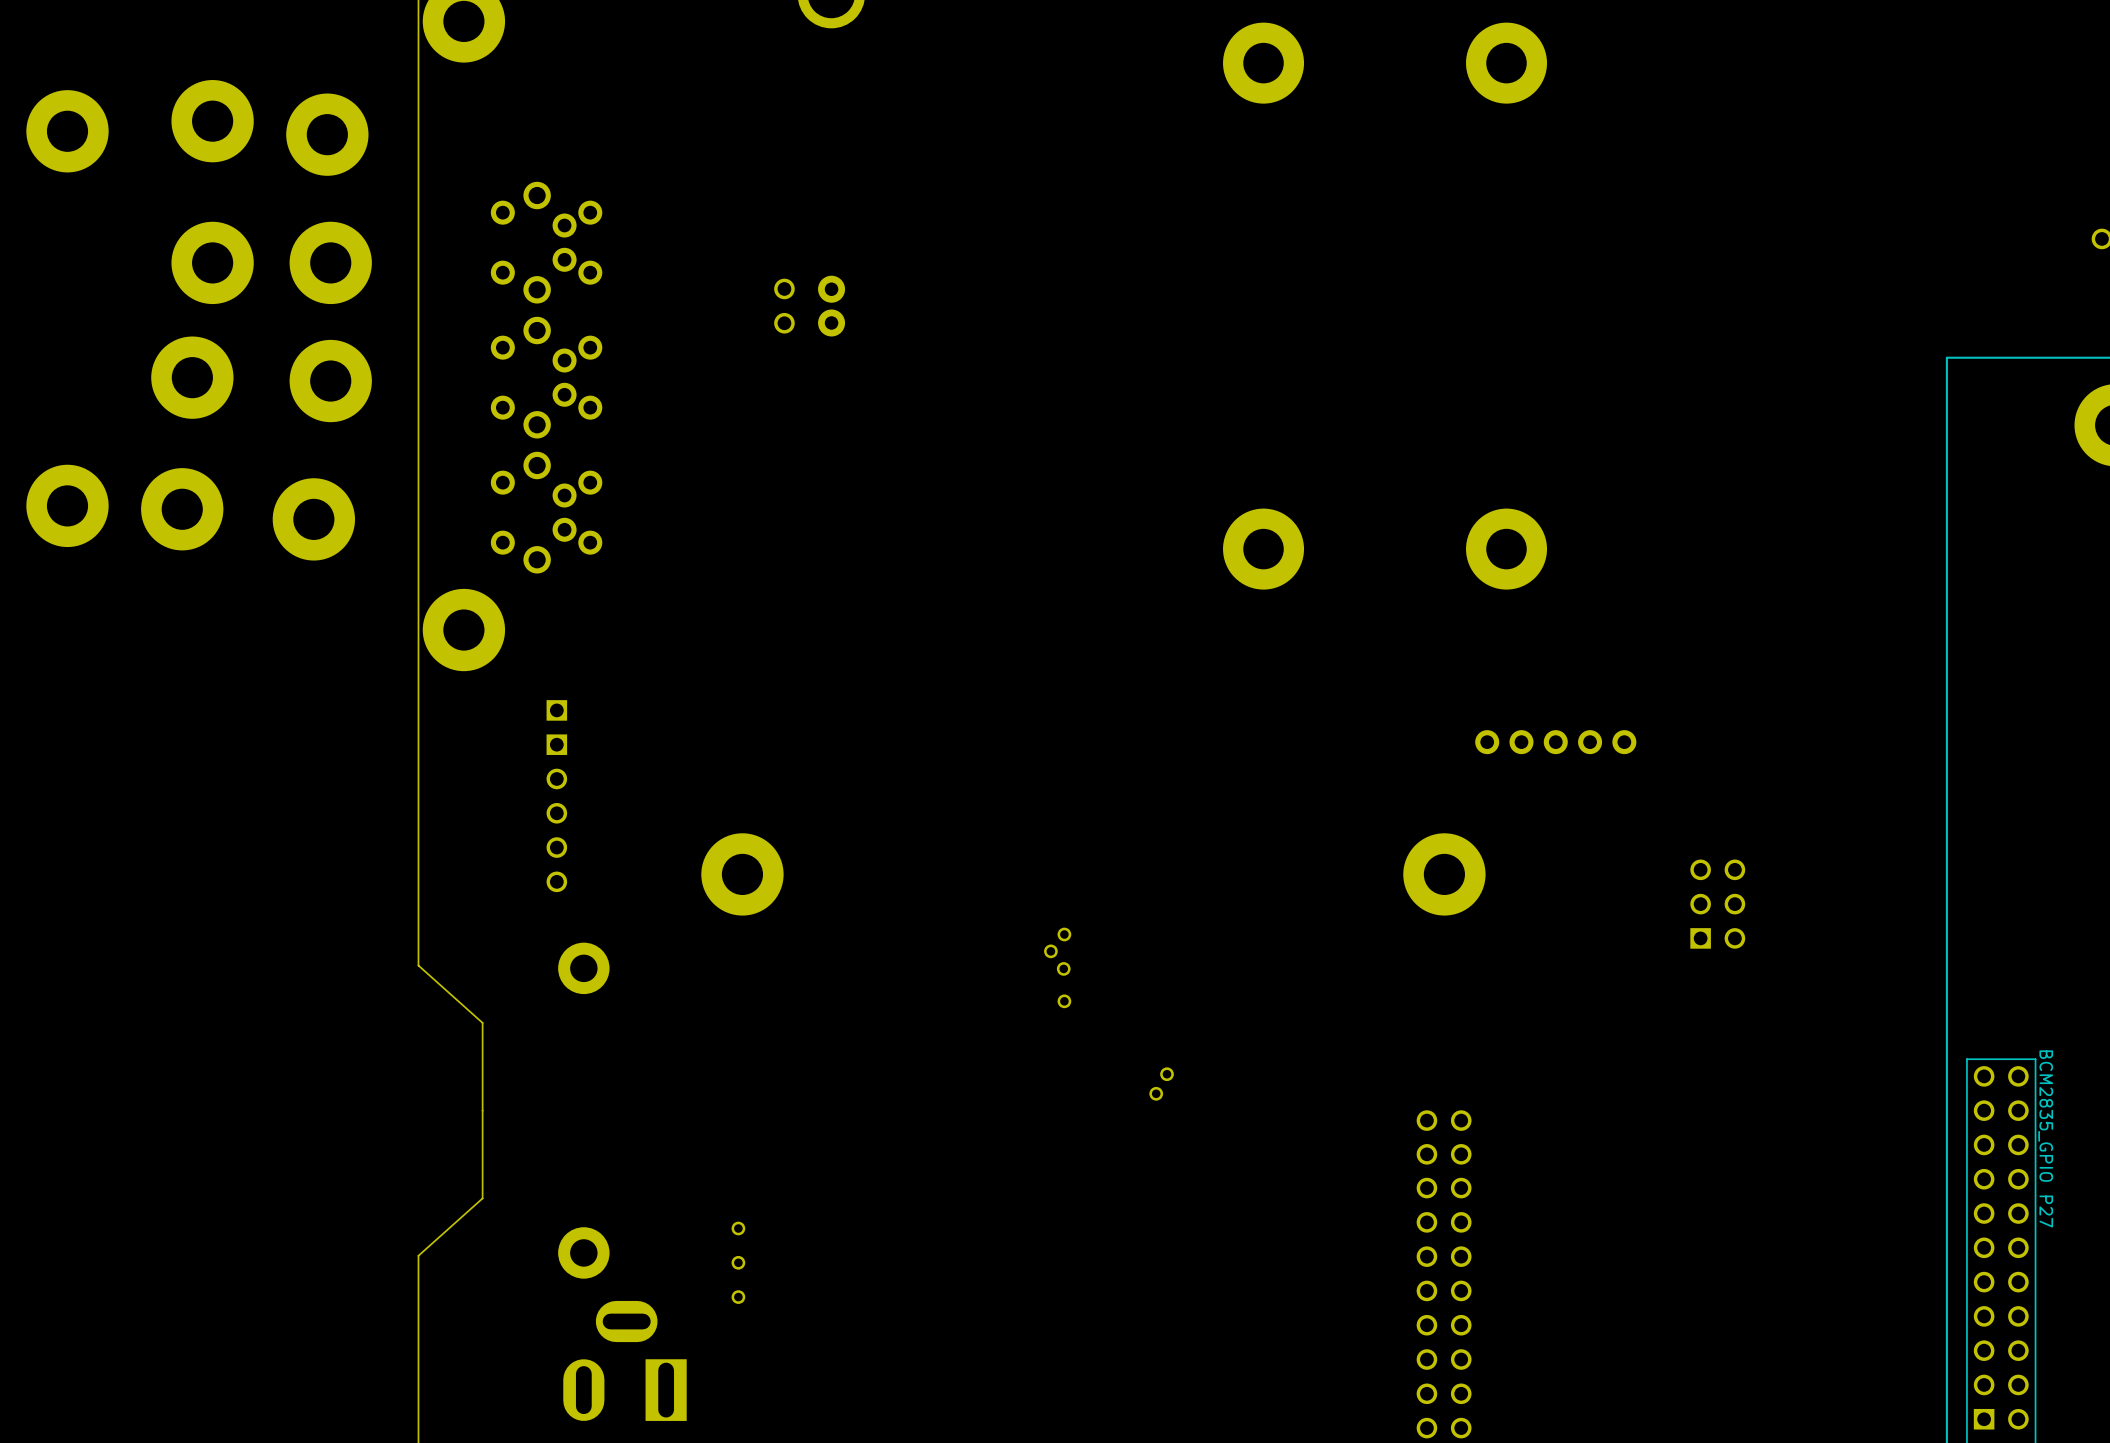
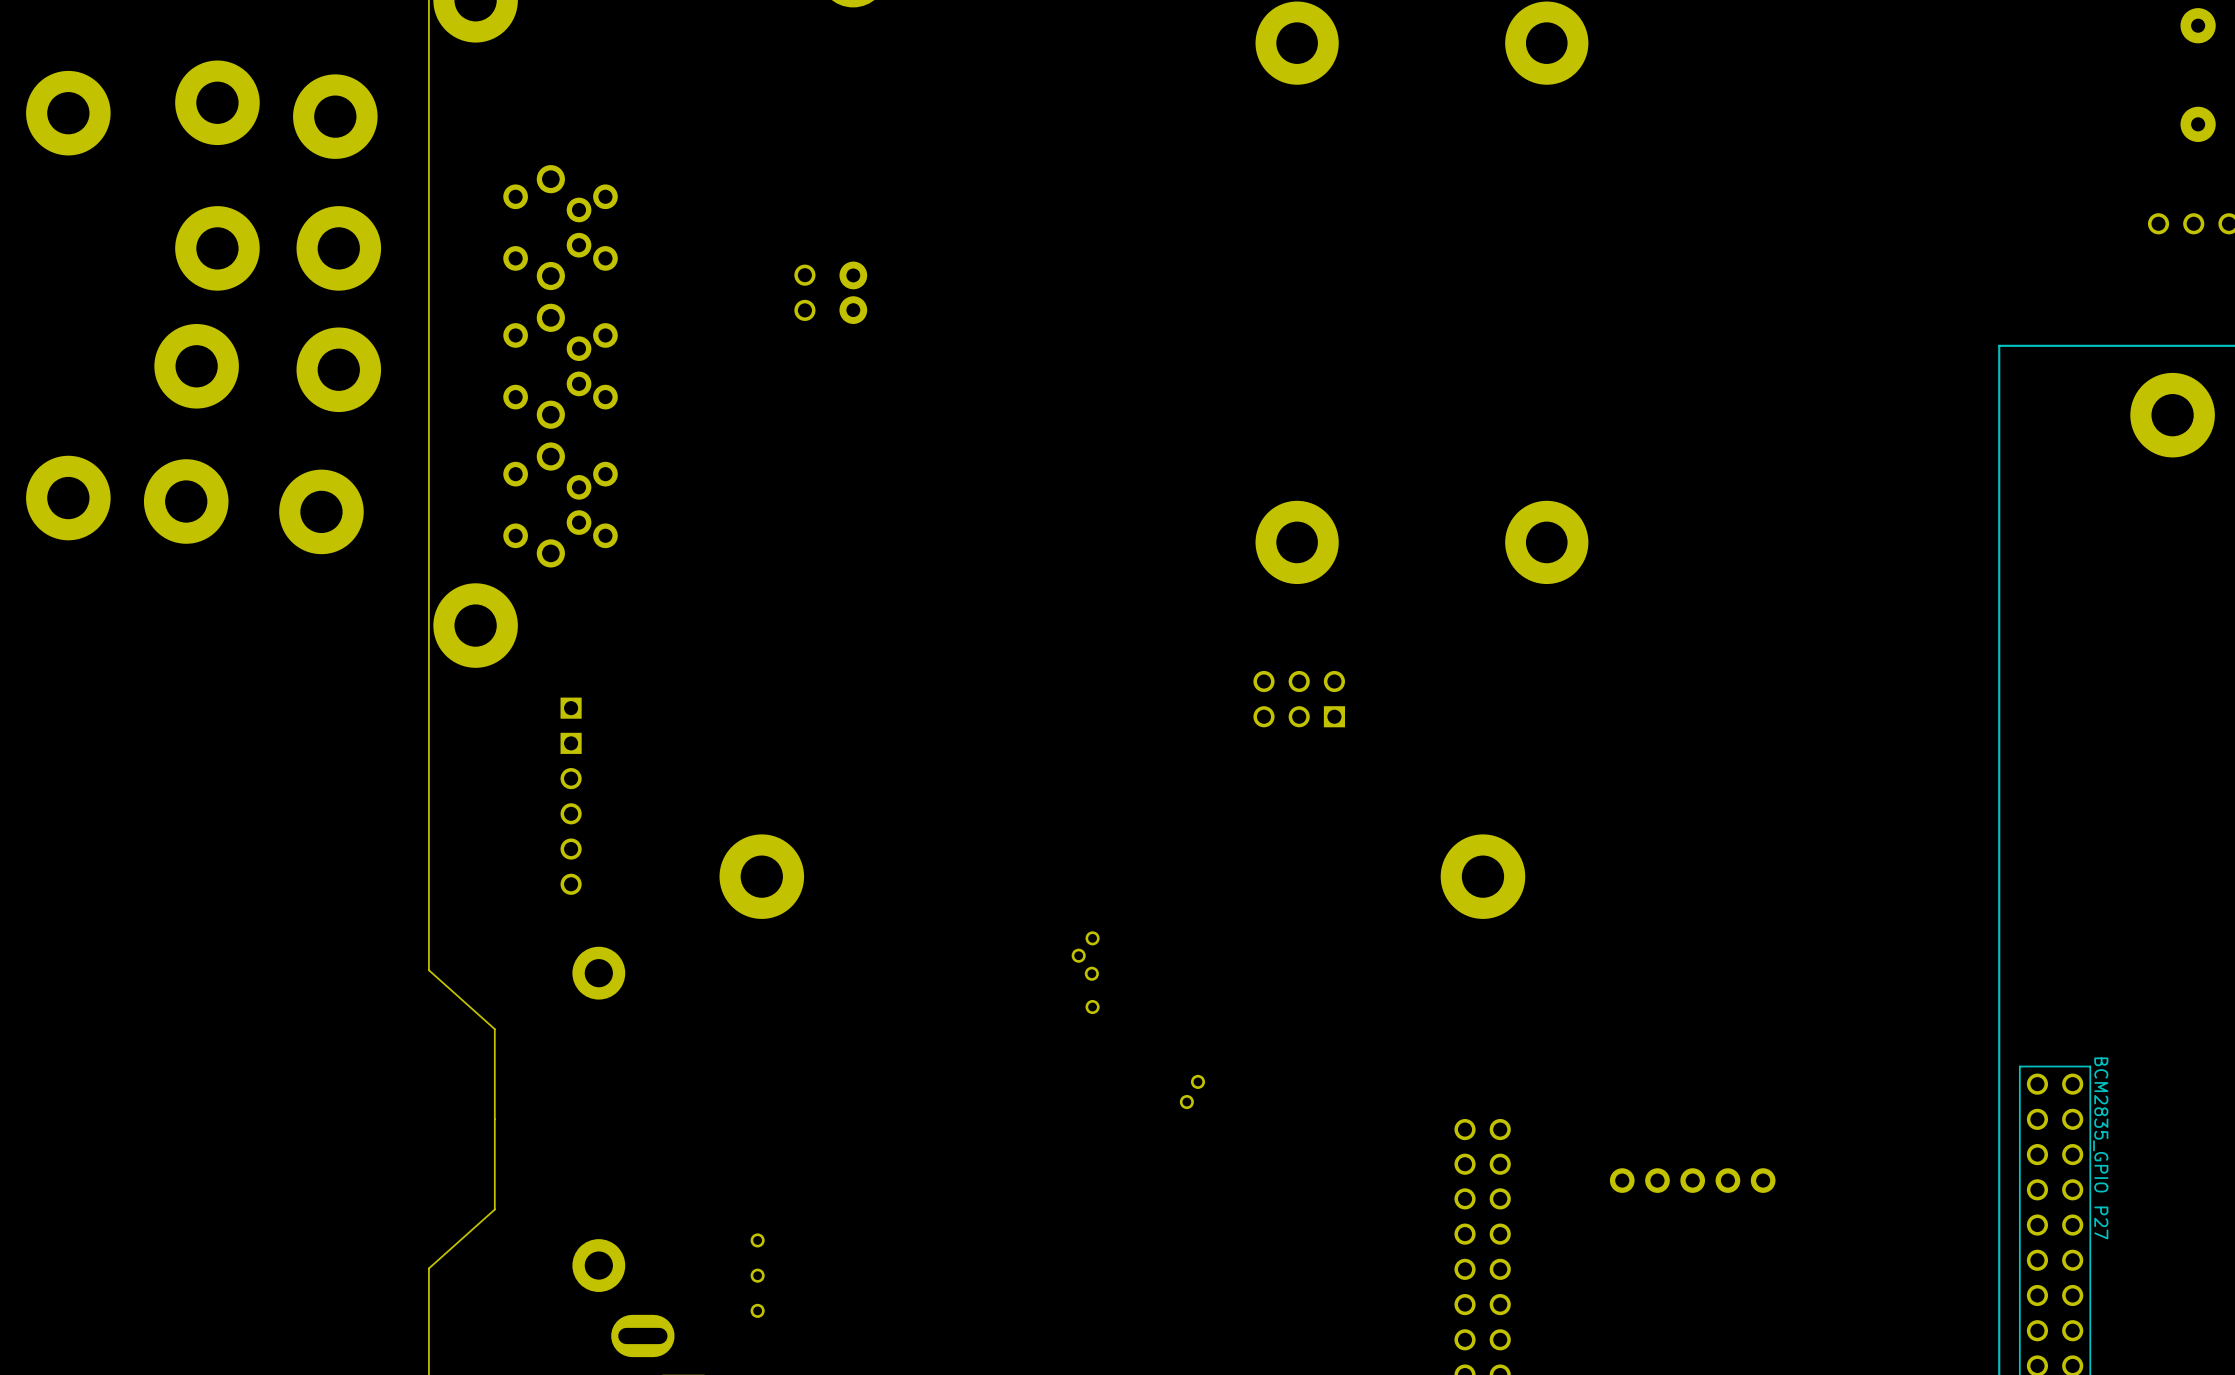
part: none -> (1299, 699)
part: (1555, 742) -> none
part: (1717, 904) -> none
part: none -> (1692, 1180)

